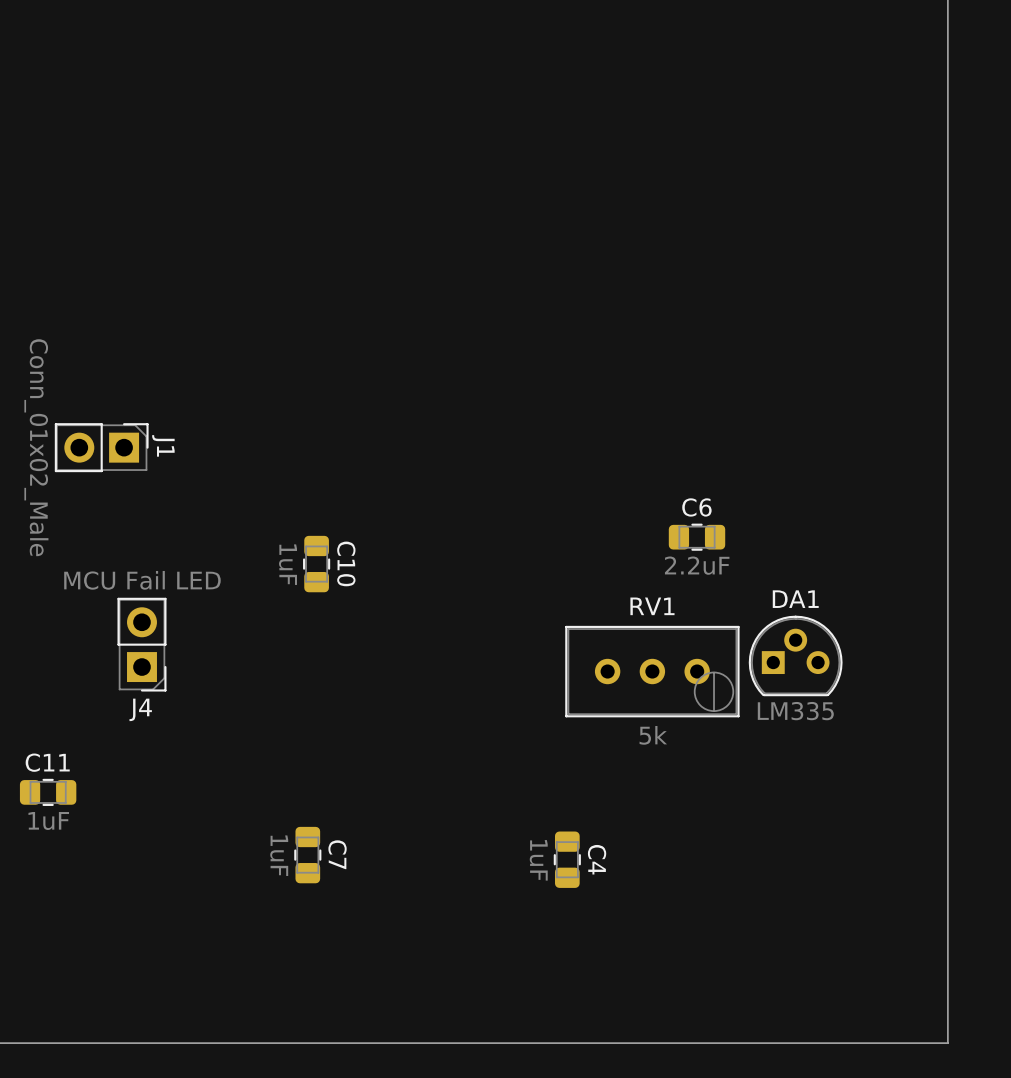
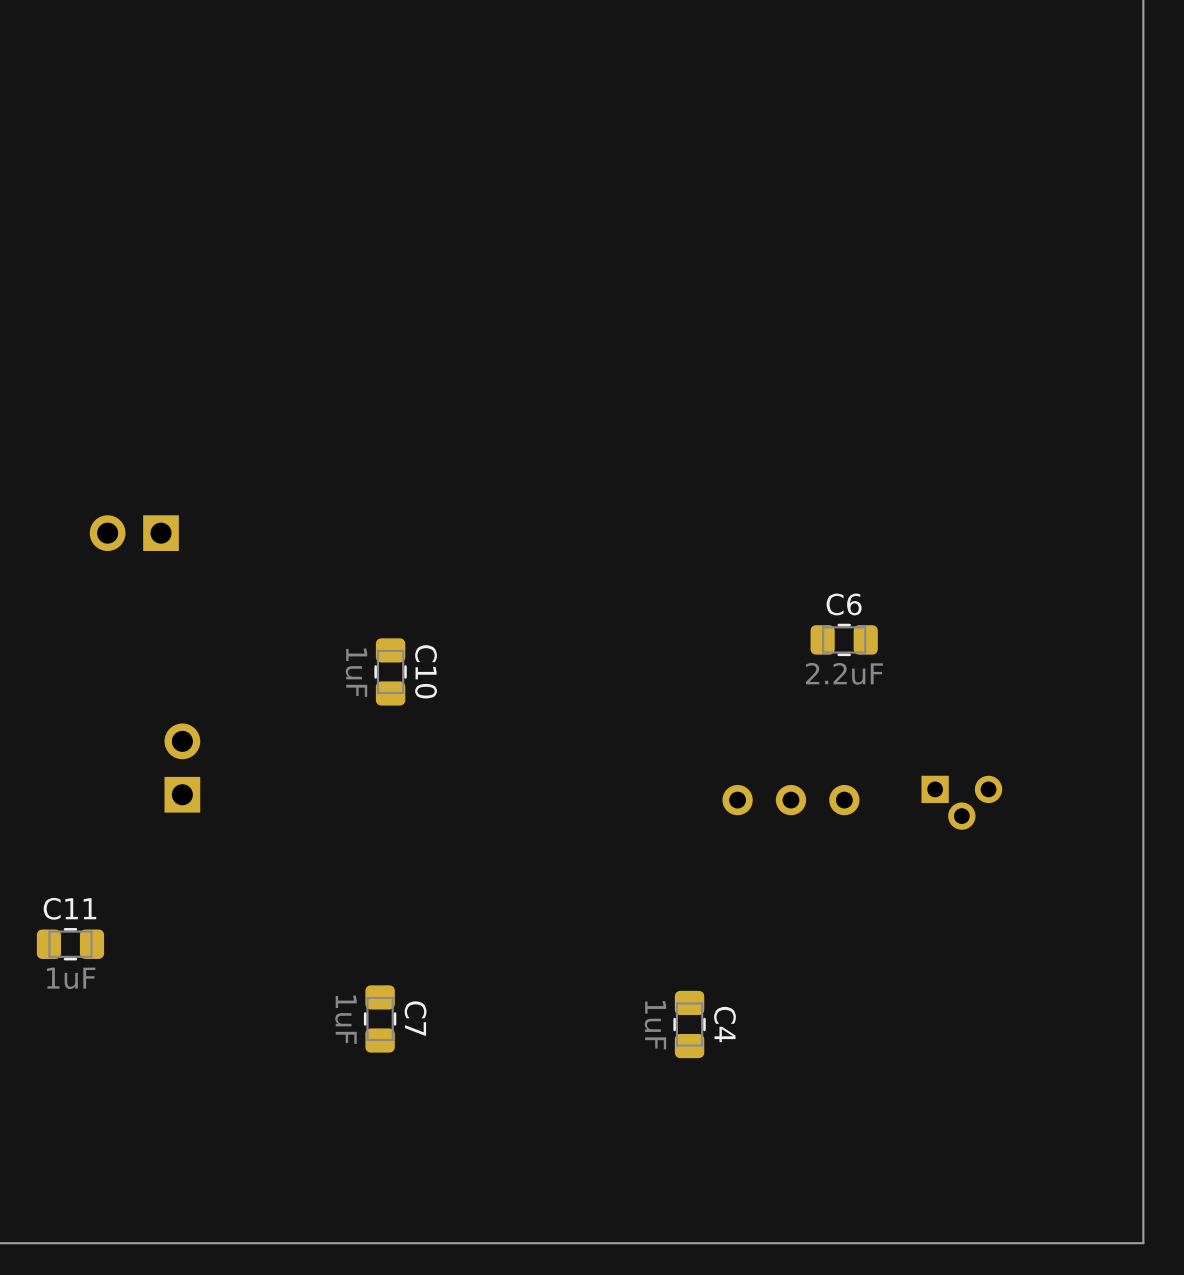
J1 side: bottom (101, 447) -> top (134, 533)
J4 side: bottom (141, 644) -> top (182, 768)
DA1 side: bottom (795, 655) -> top (961, 802)
RV1 side: bottom (652, 671) -> top (790, 800)

